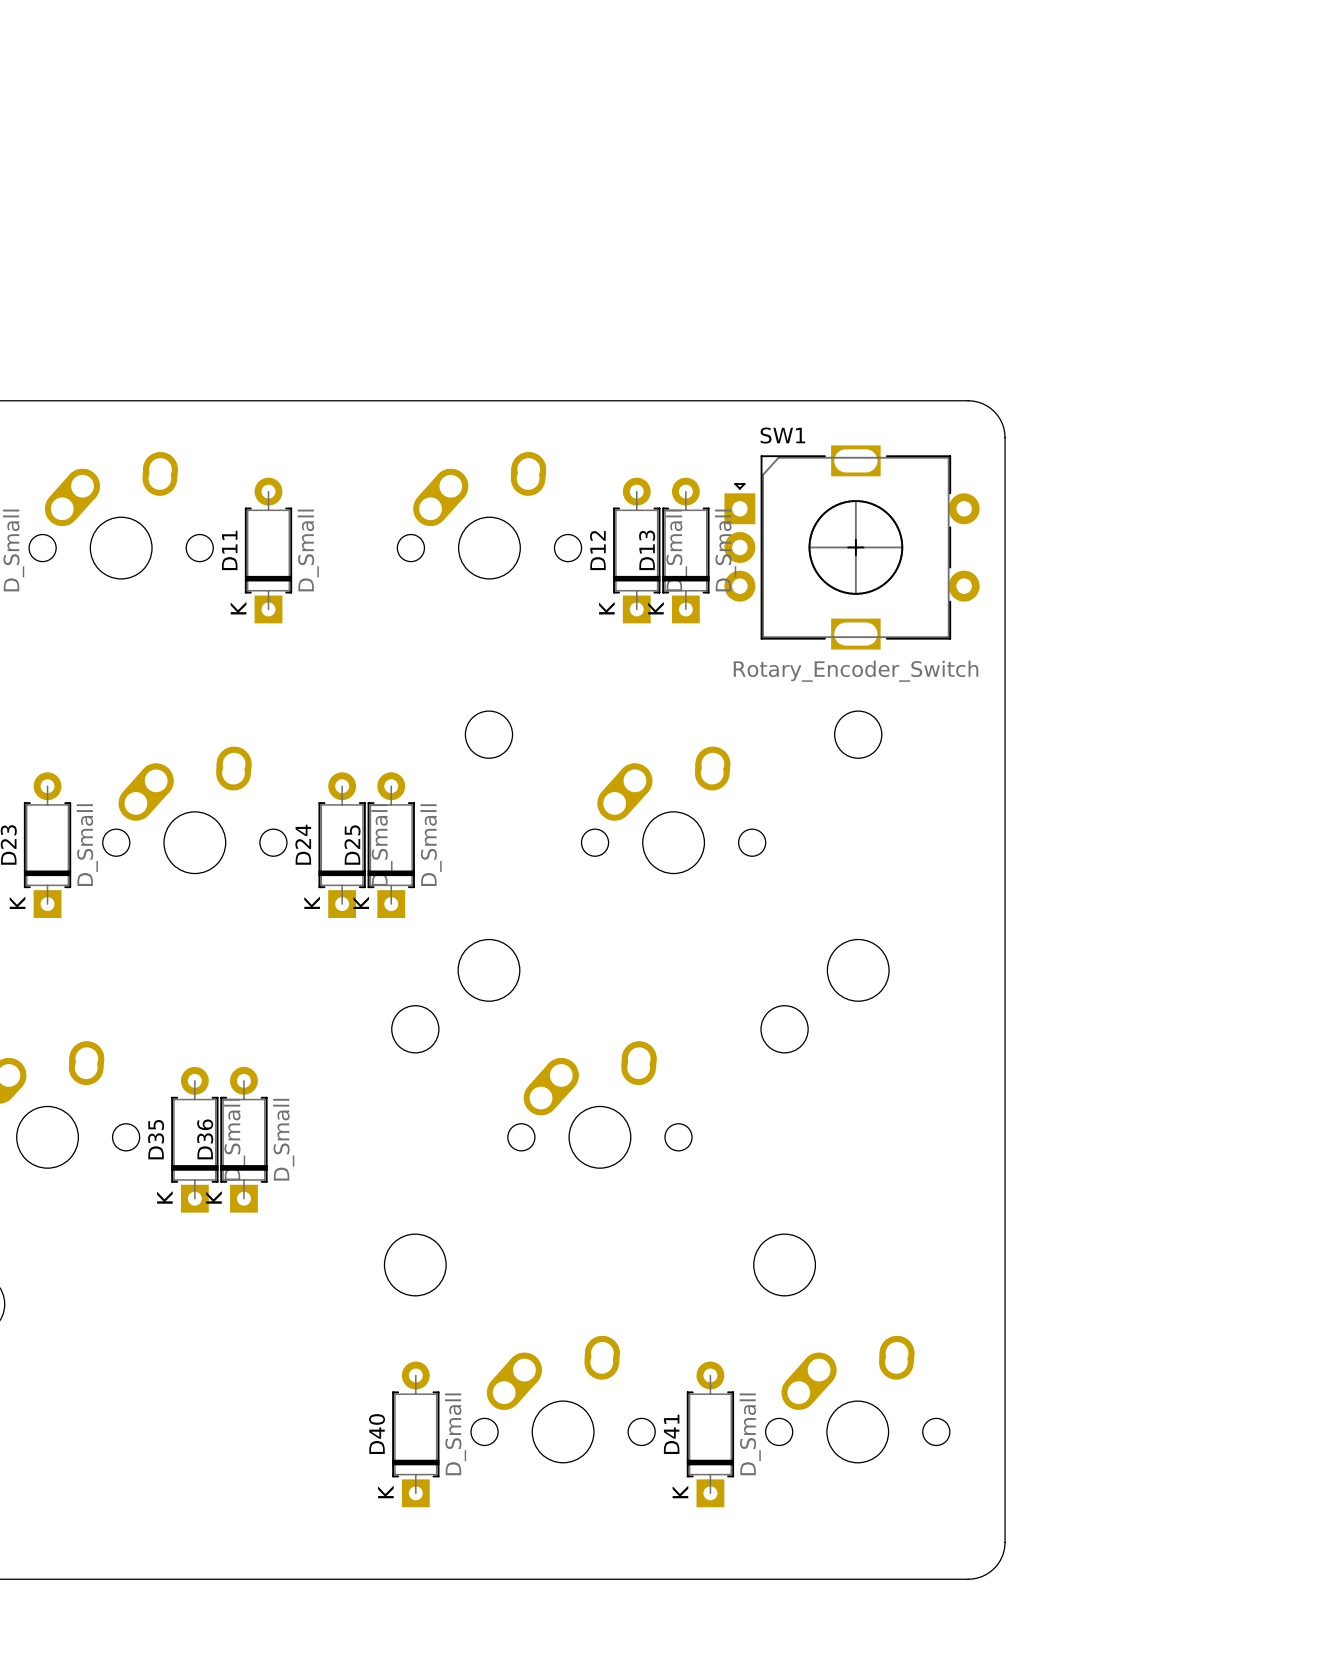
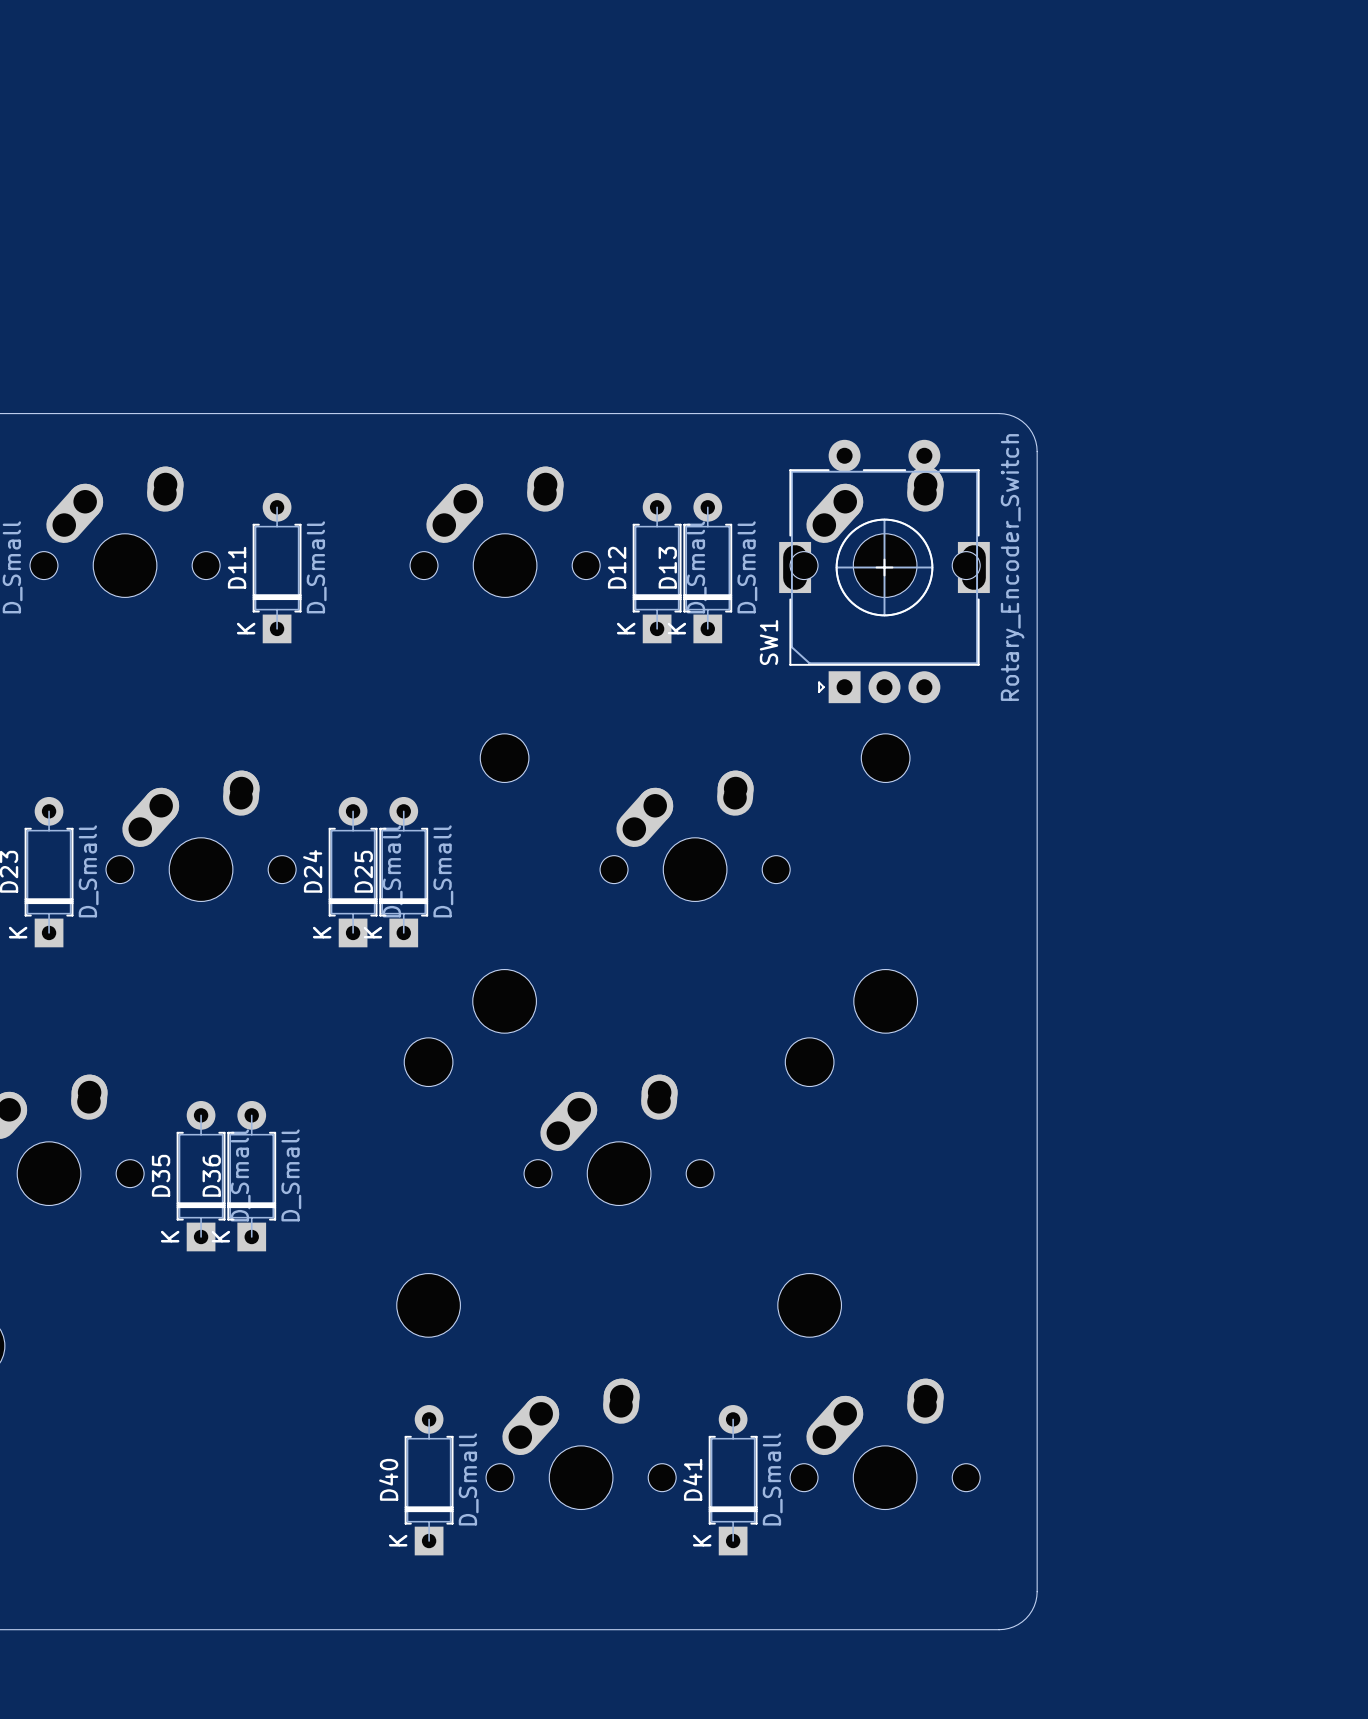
part: none -> (885, 531)
SW1 rotation: 0° (852, 547) -> 90° counterclockwise (884, 571)

